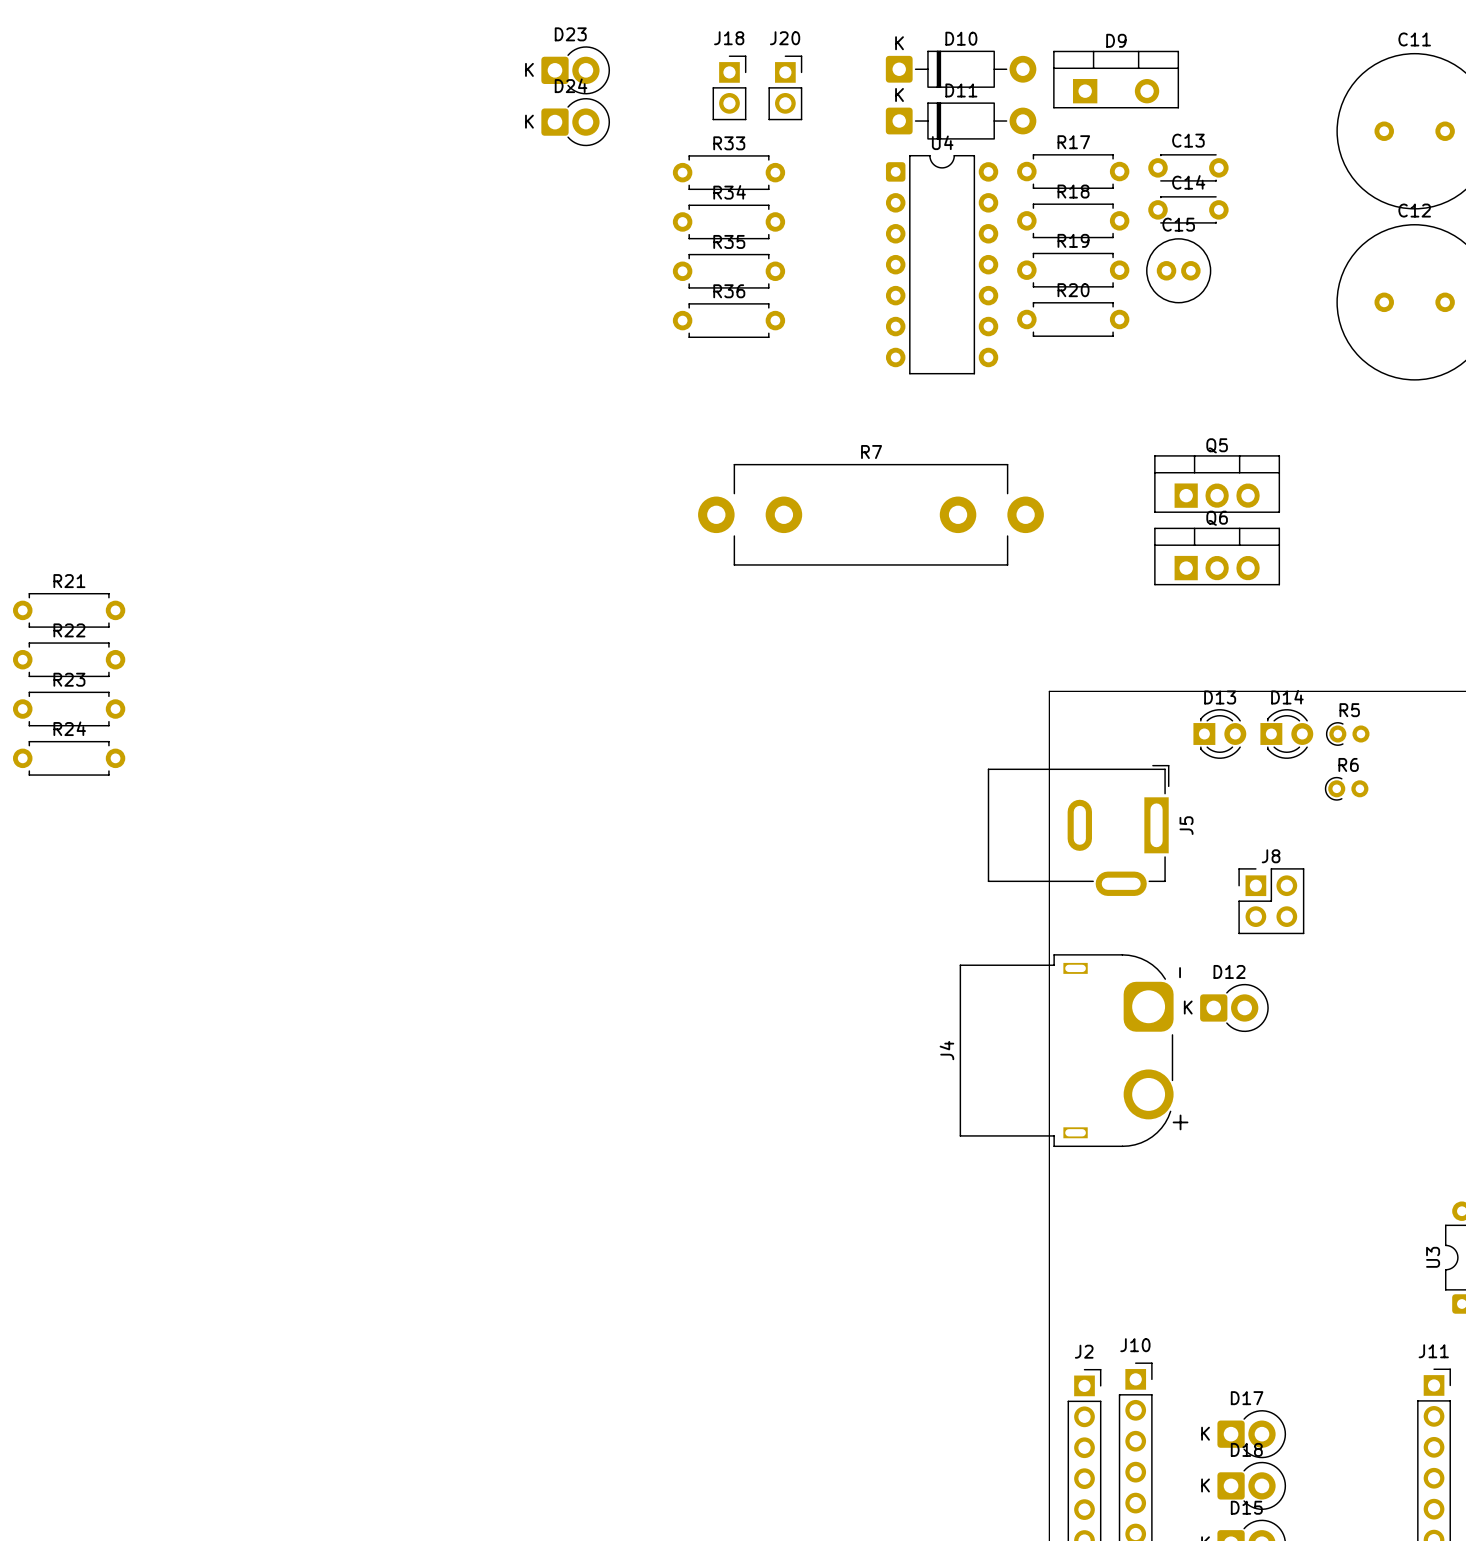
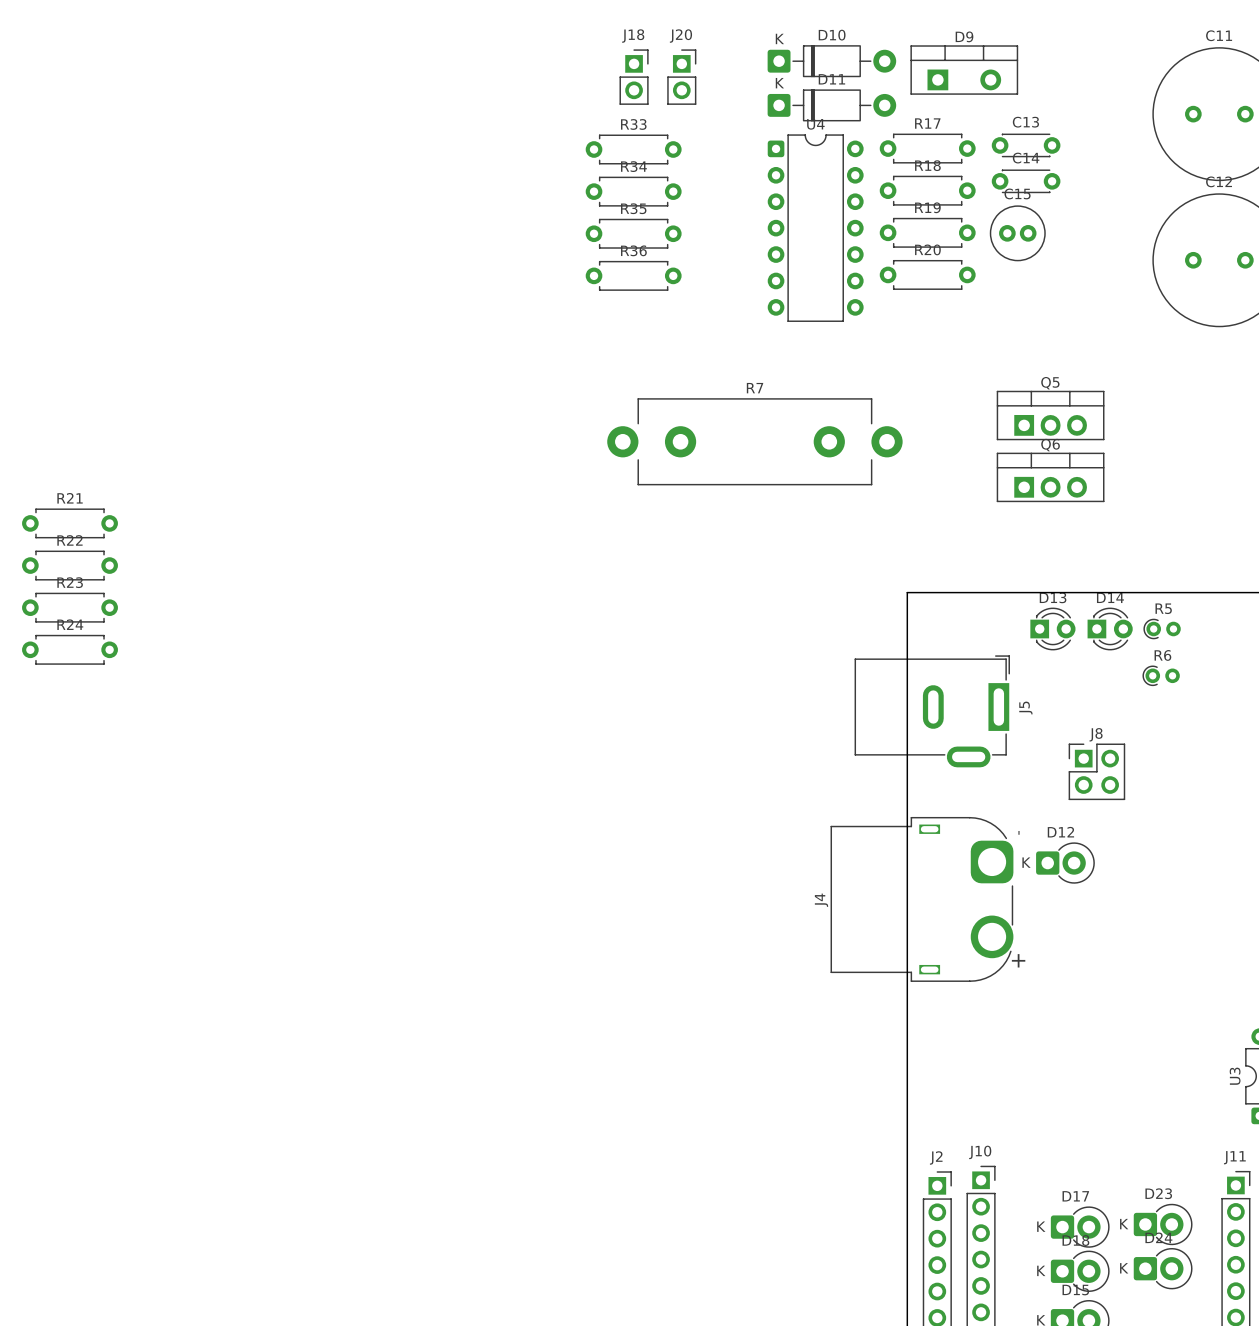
D23 position: (575, 70) -> (1163, 1224)
D24 position: (575, 122) -> (1163, 1268)

